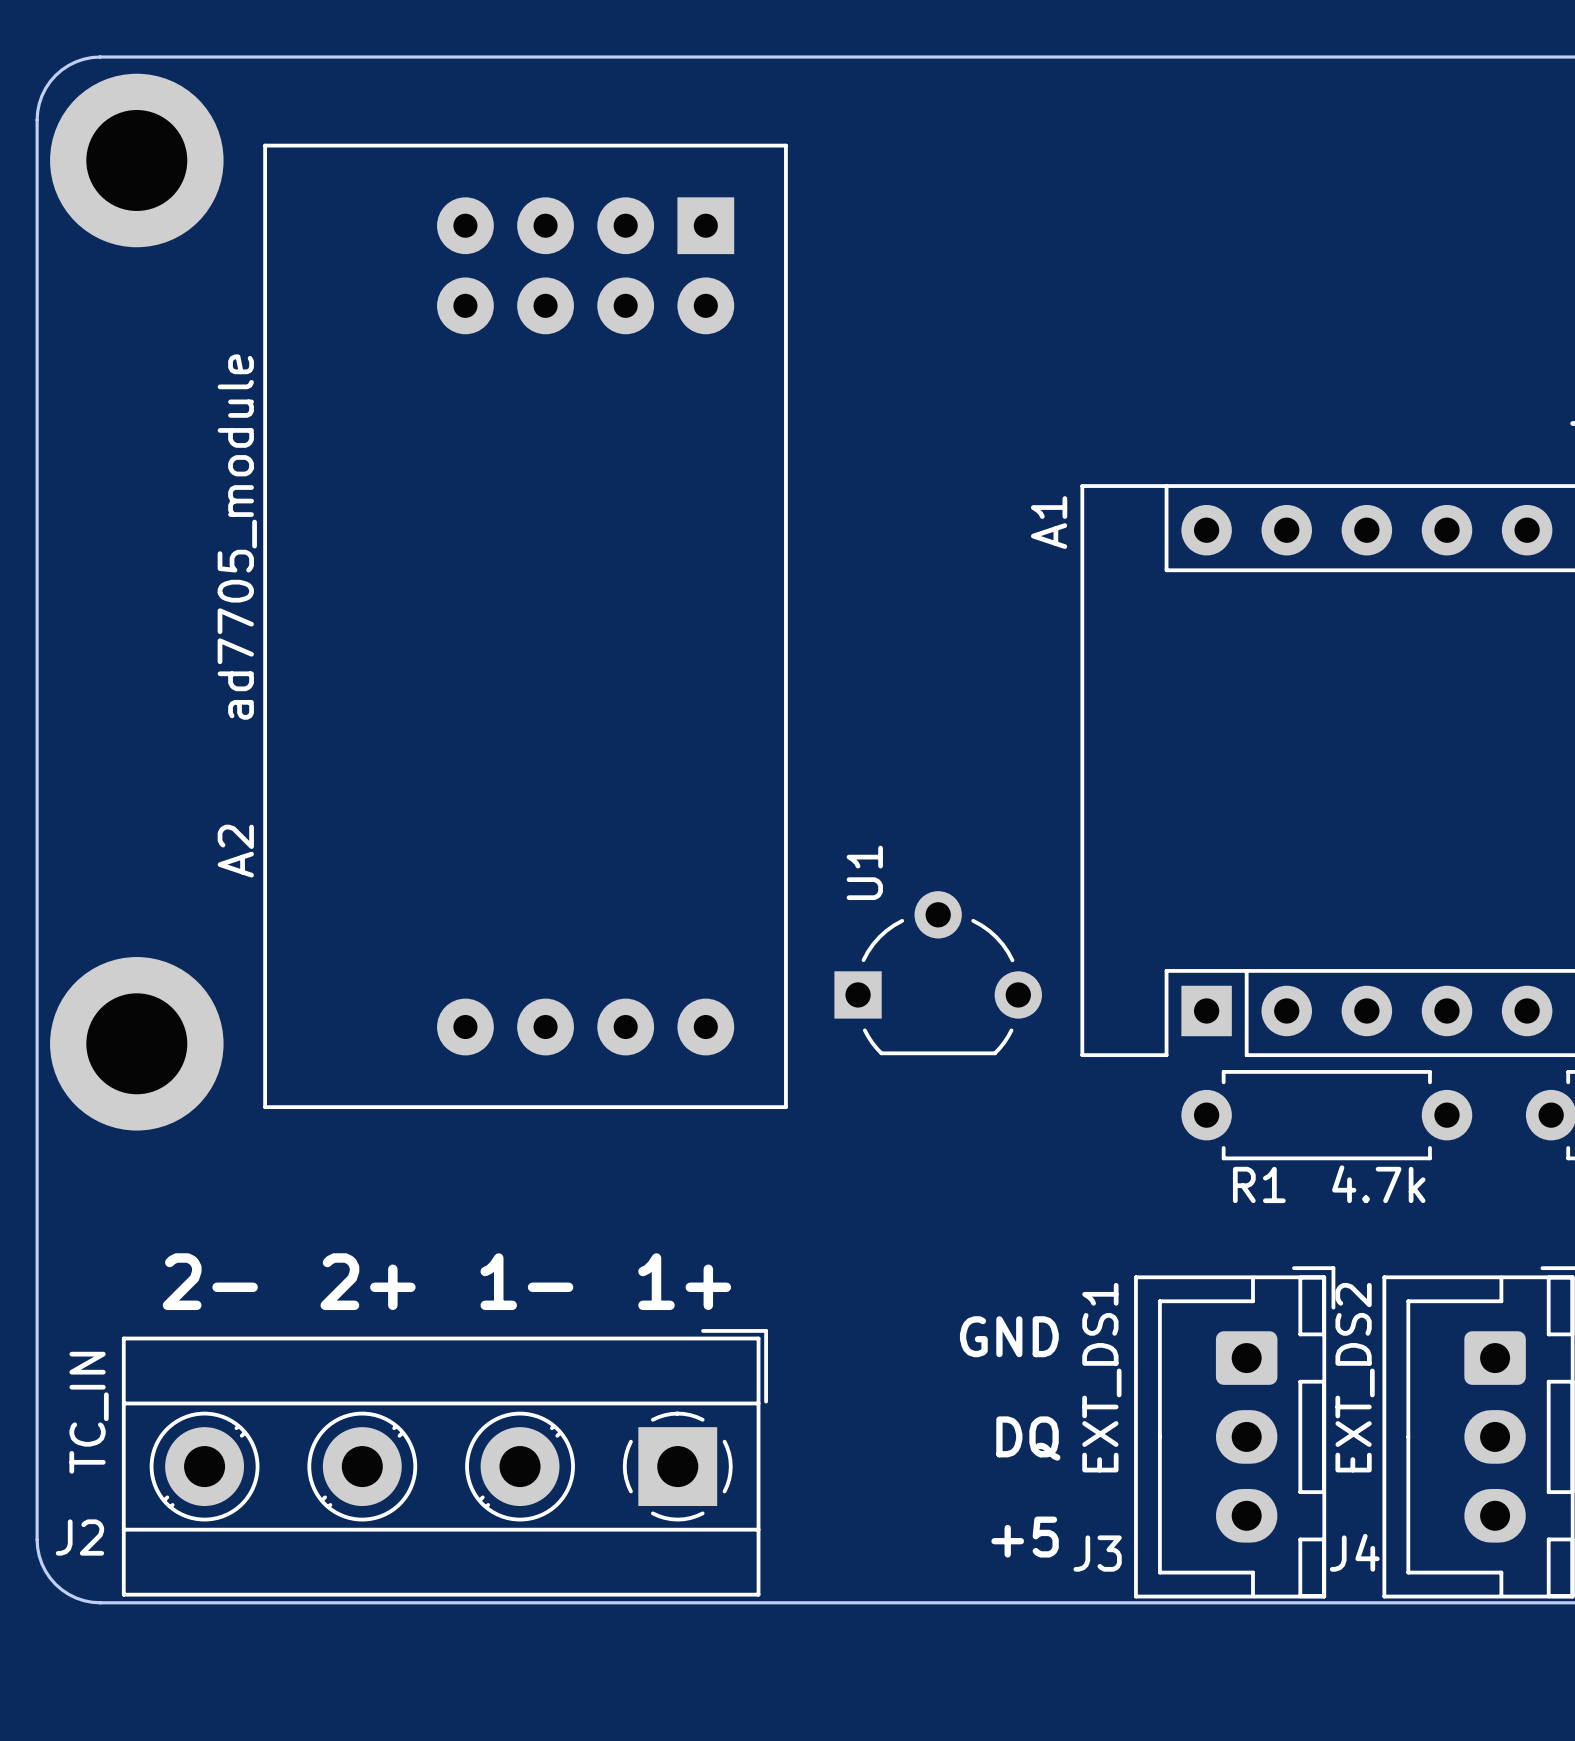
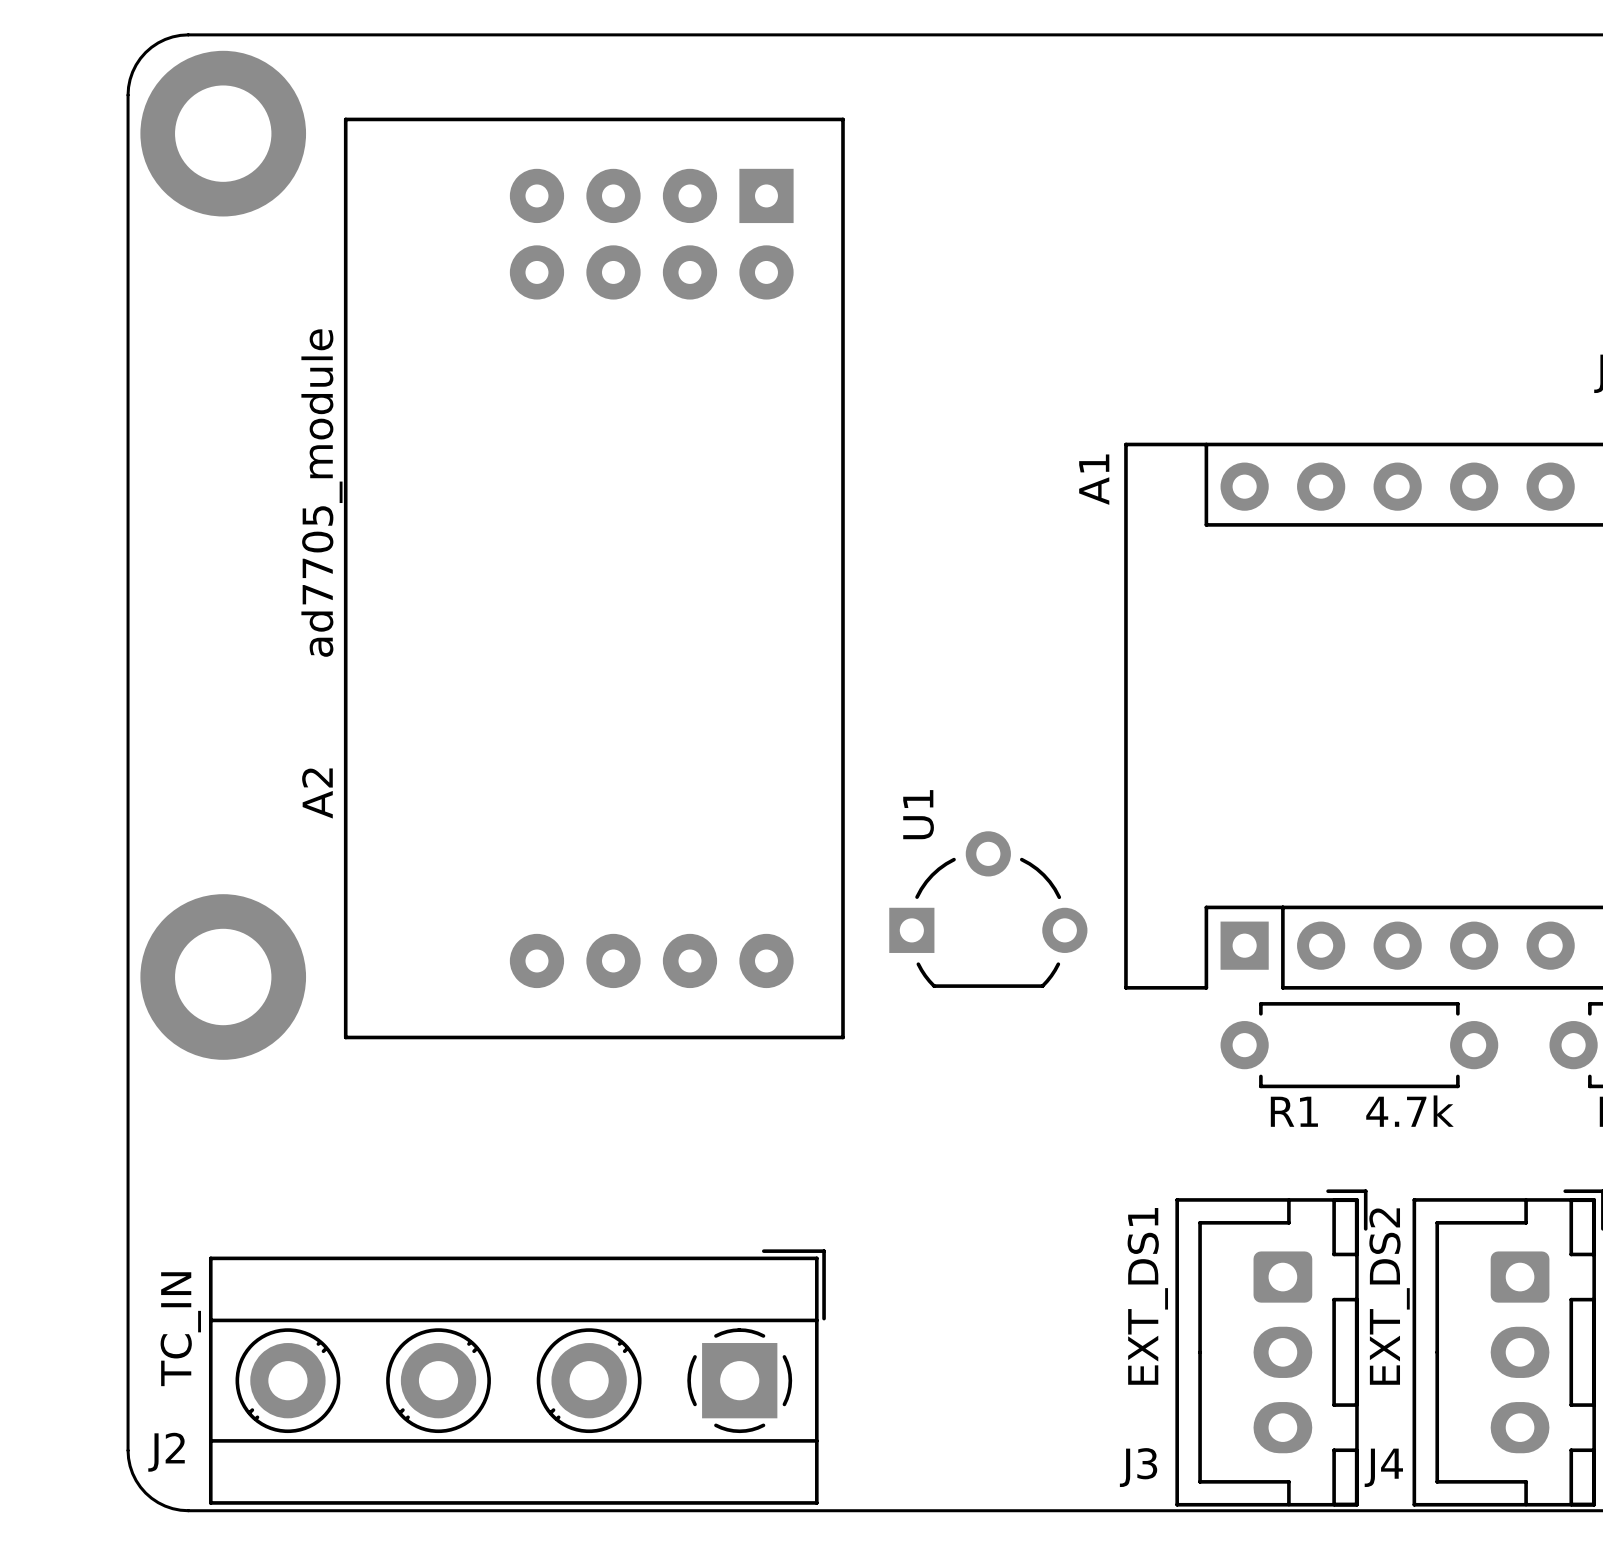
text: 2- (210, 1281) -> none
text: 2+ (368, 1281) -> none
text: 1- (526, 1281) -> none
text: 1+ (684, 1281) -> none
text: GND (1009, 1336) -> none
text: DQ (1028, 1438) -> none
text: +5 (1025, 1537) -> none

